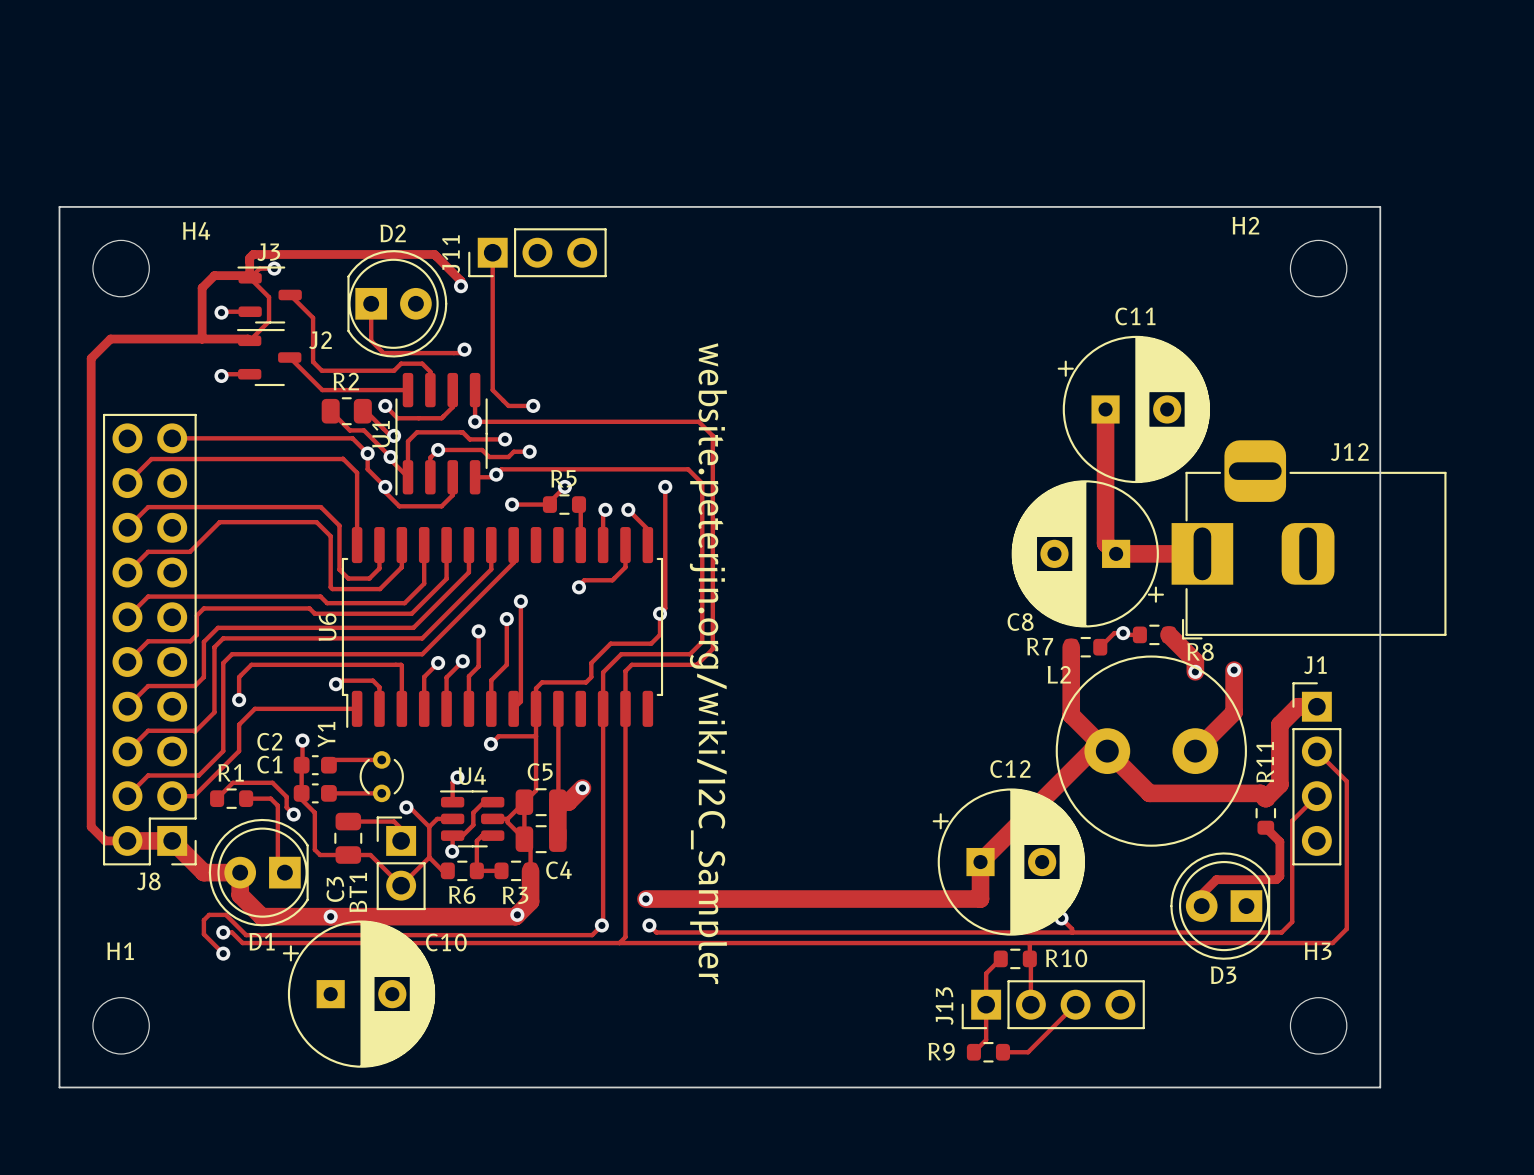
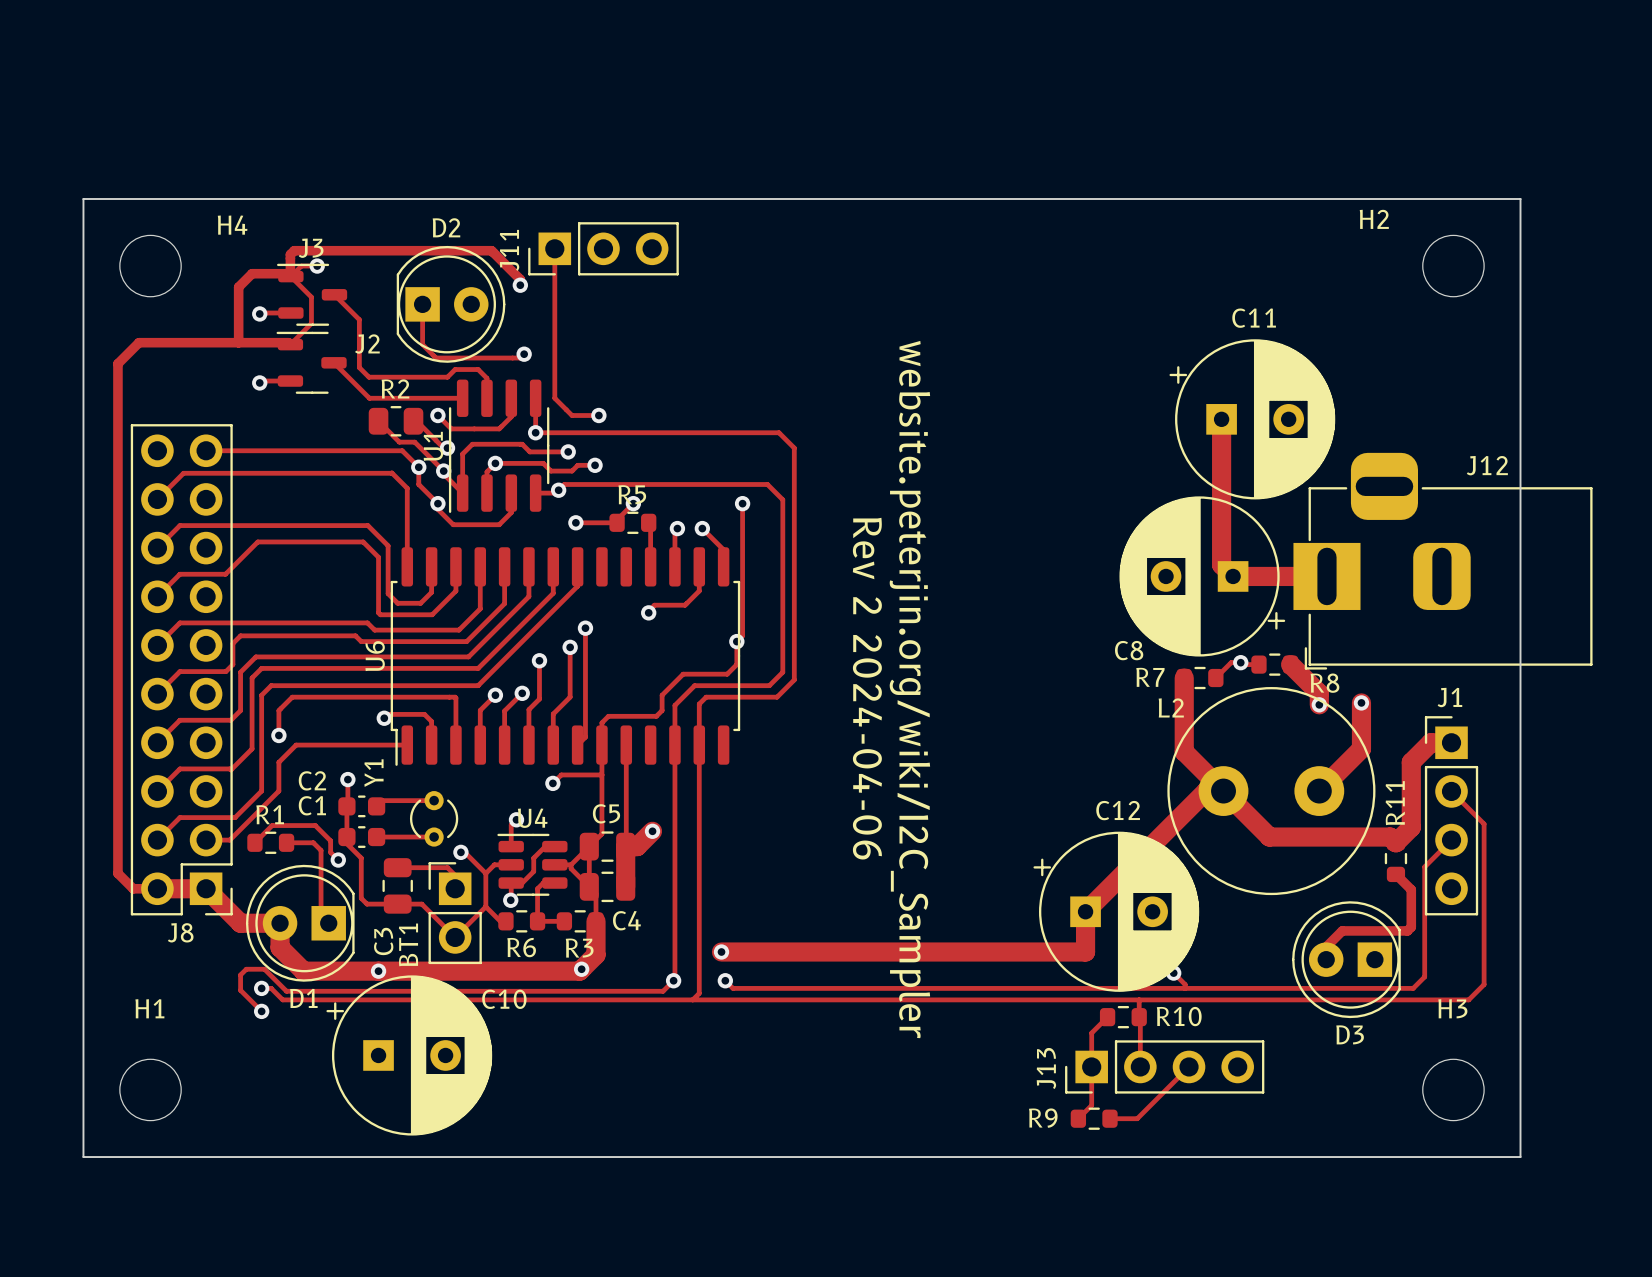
text: none -> Rev 2 2024-04-06 (867, 688)
text position: website.peterjin.org/wiki/I2C_Sampler (708, 663) -> website.peterjin.org/wiki/I2C_Sampler (909, 689)

